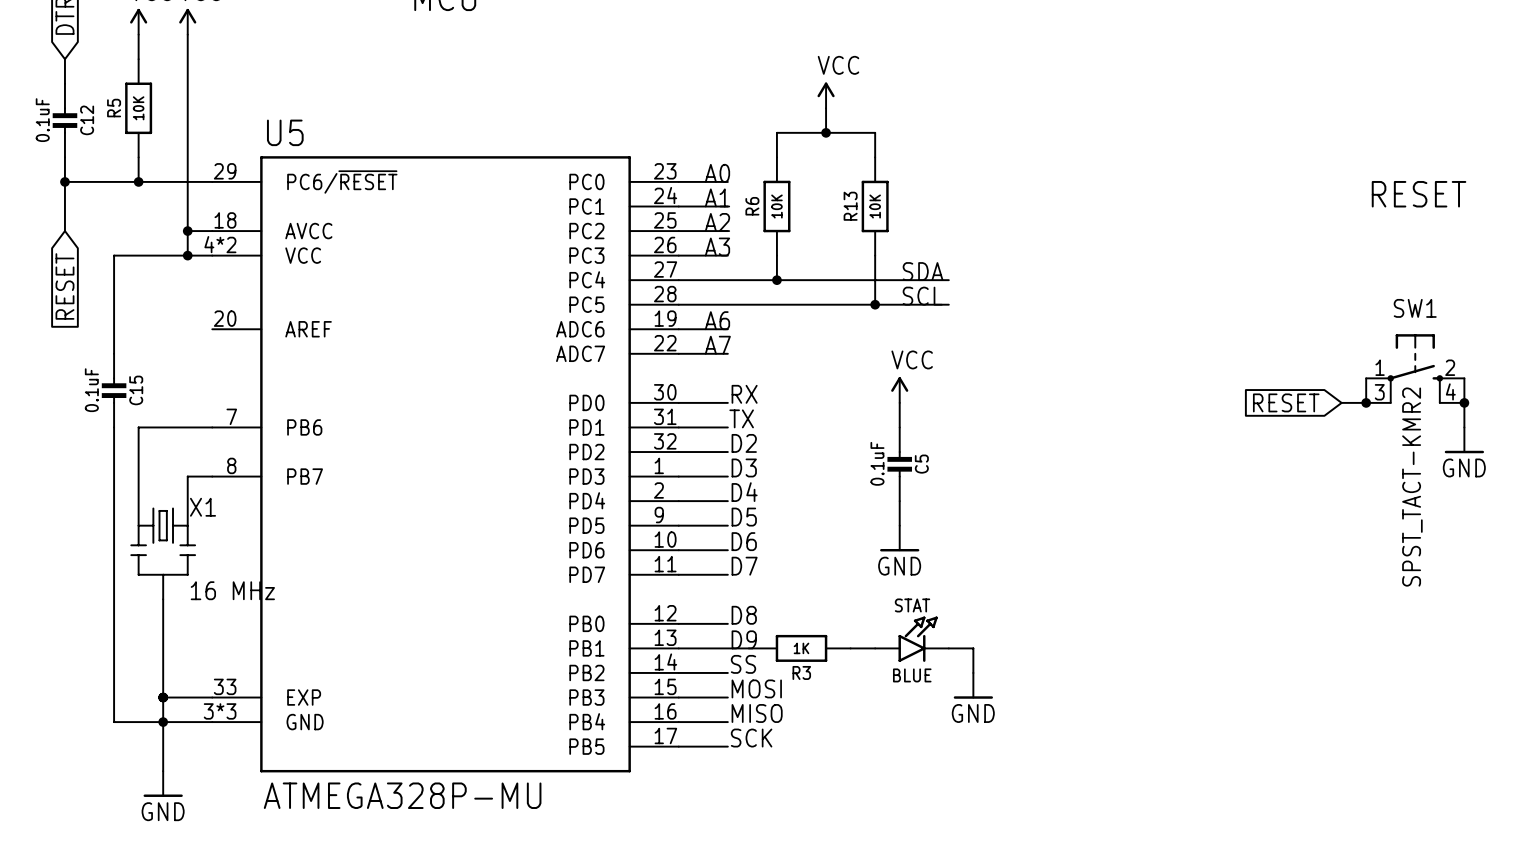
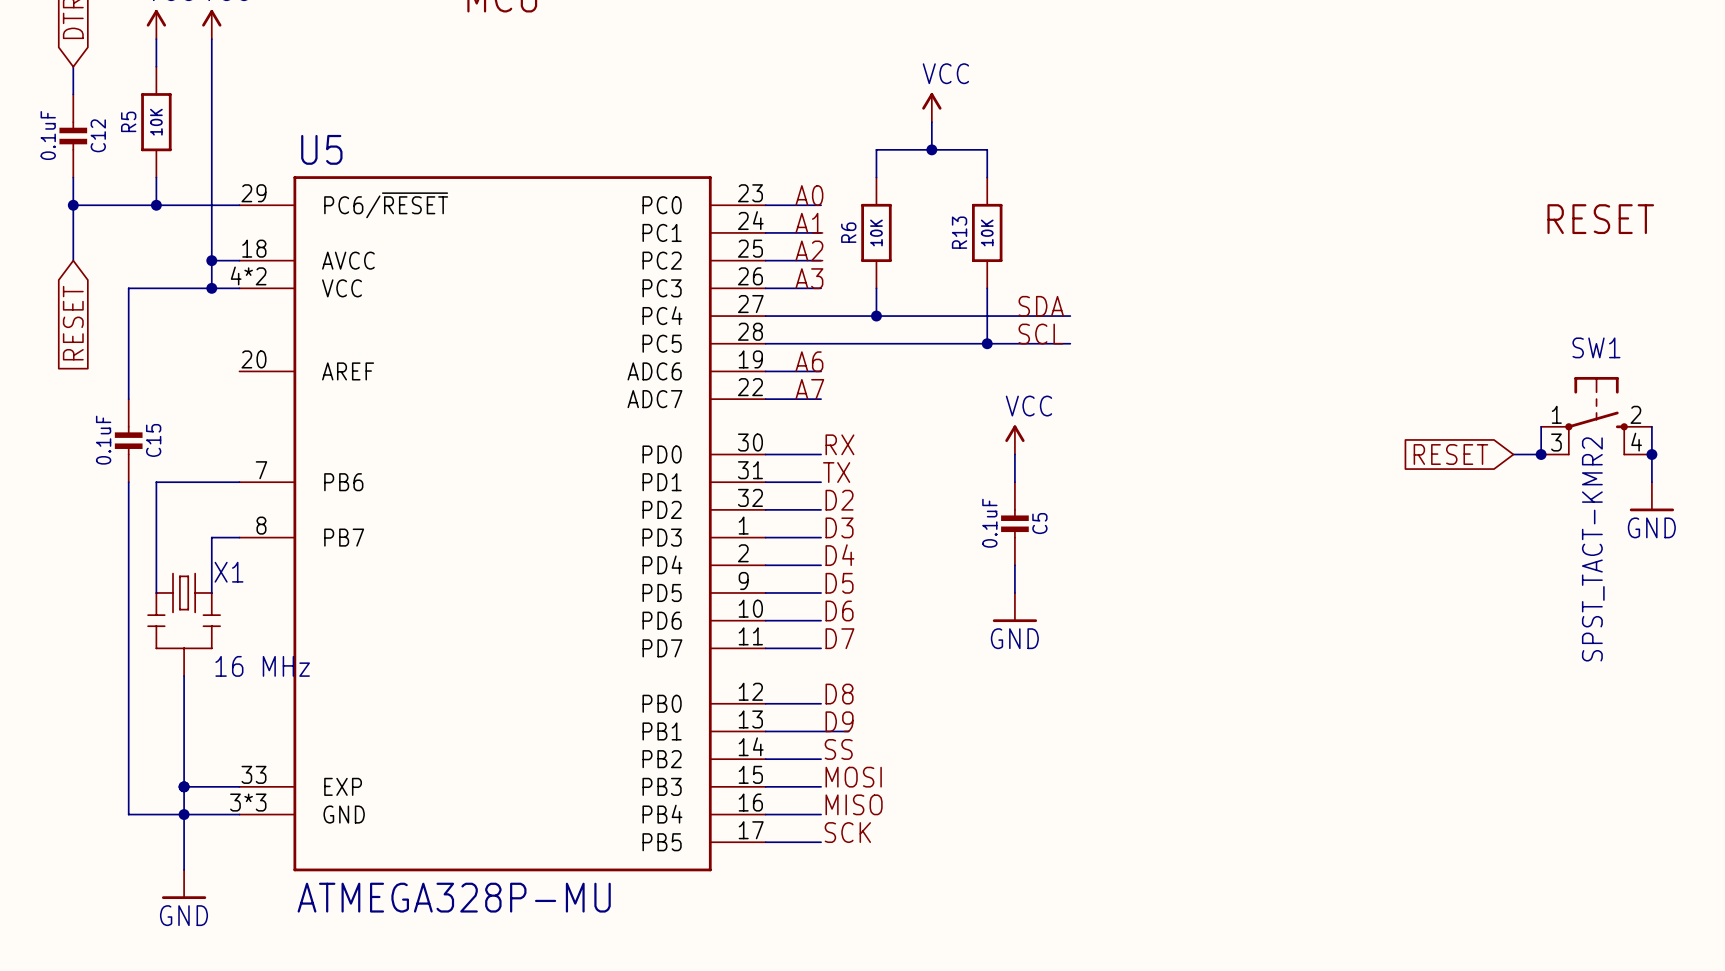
STAT: BLUE (911, 639) -> none
R3: 1K (801, 648) -> none
wire: (850, 648) (875, 648) -> none
wire: (948, 648) (973, 648) (973, 672) -> none
power symbol: GND (973, 685) -> none

